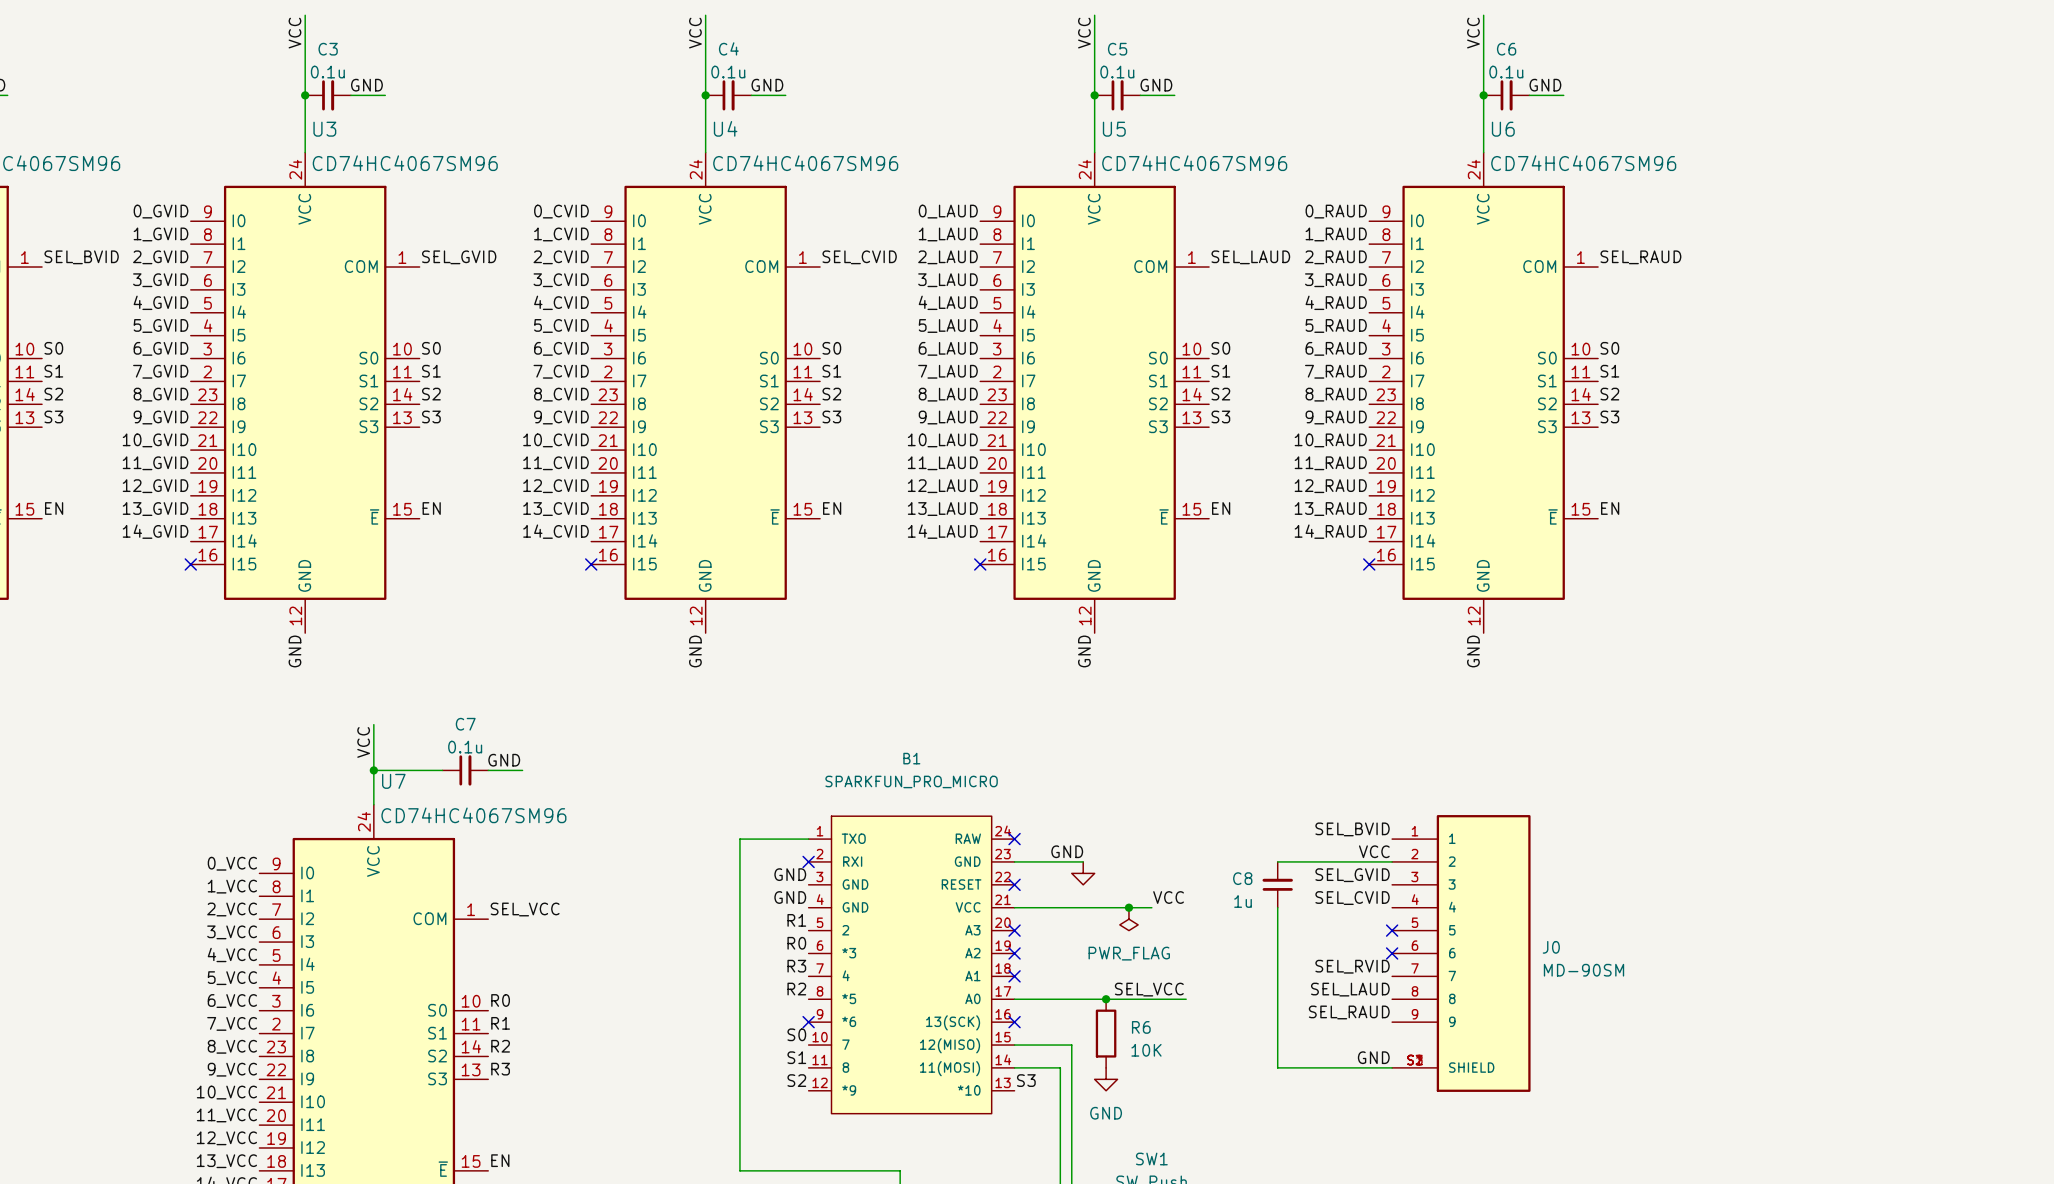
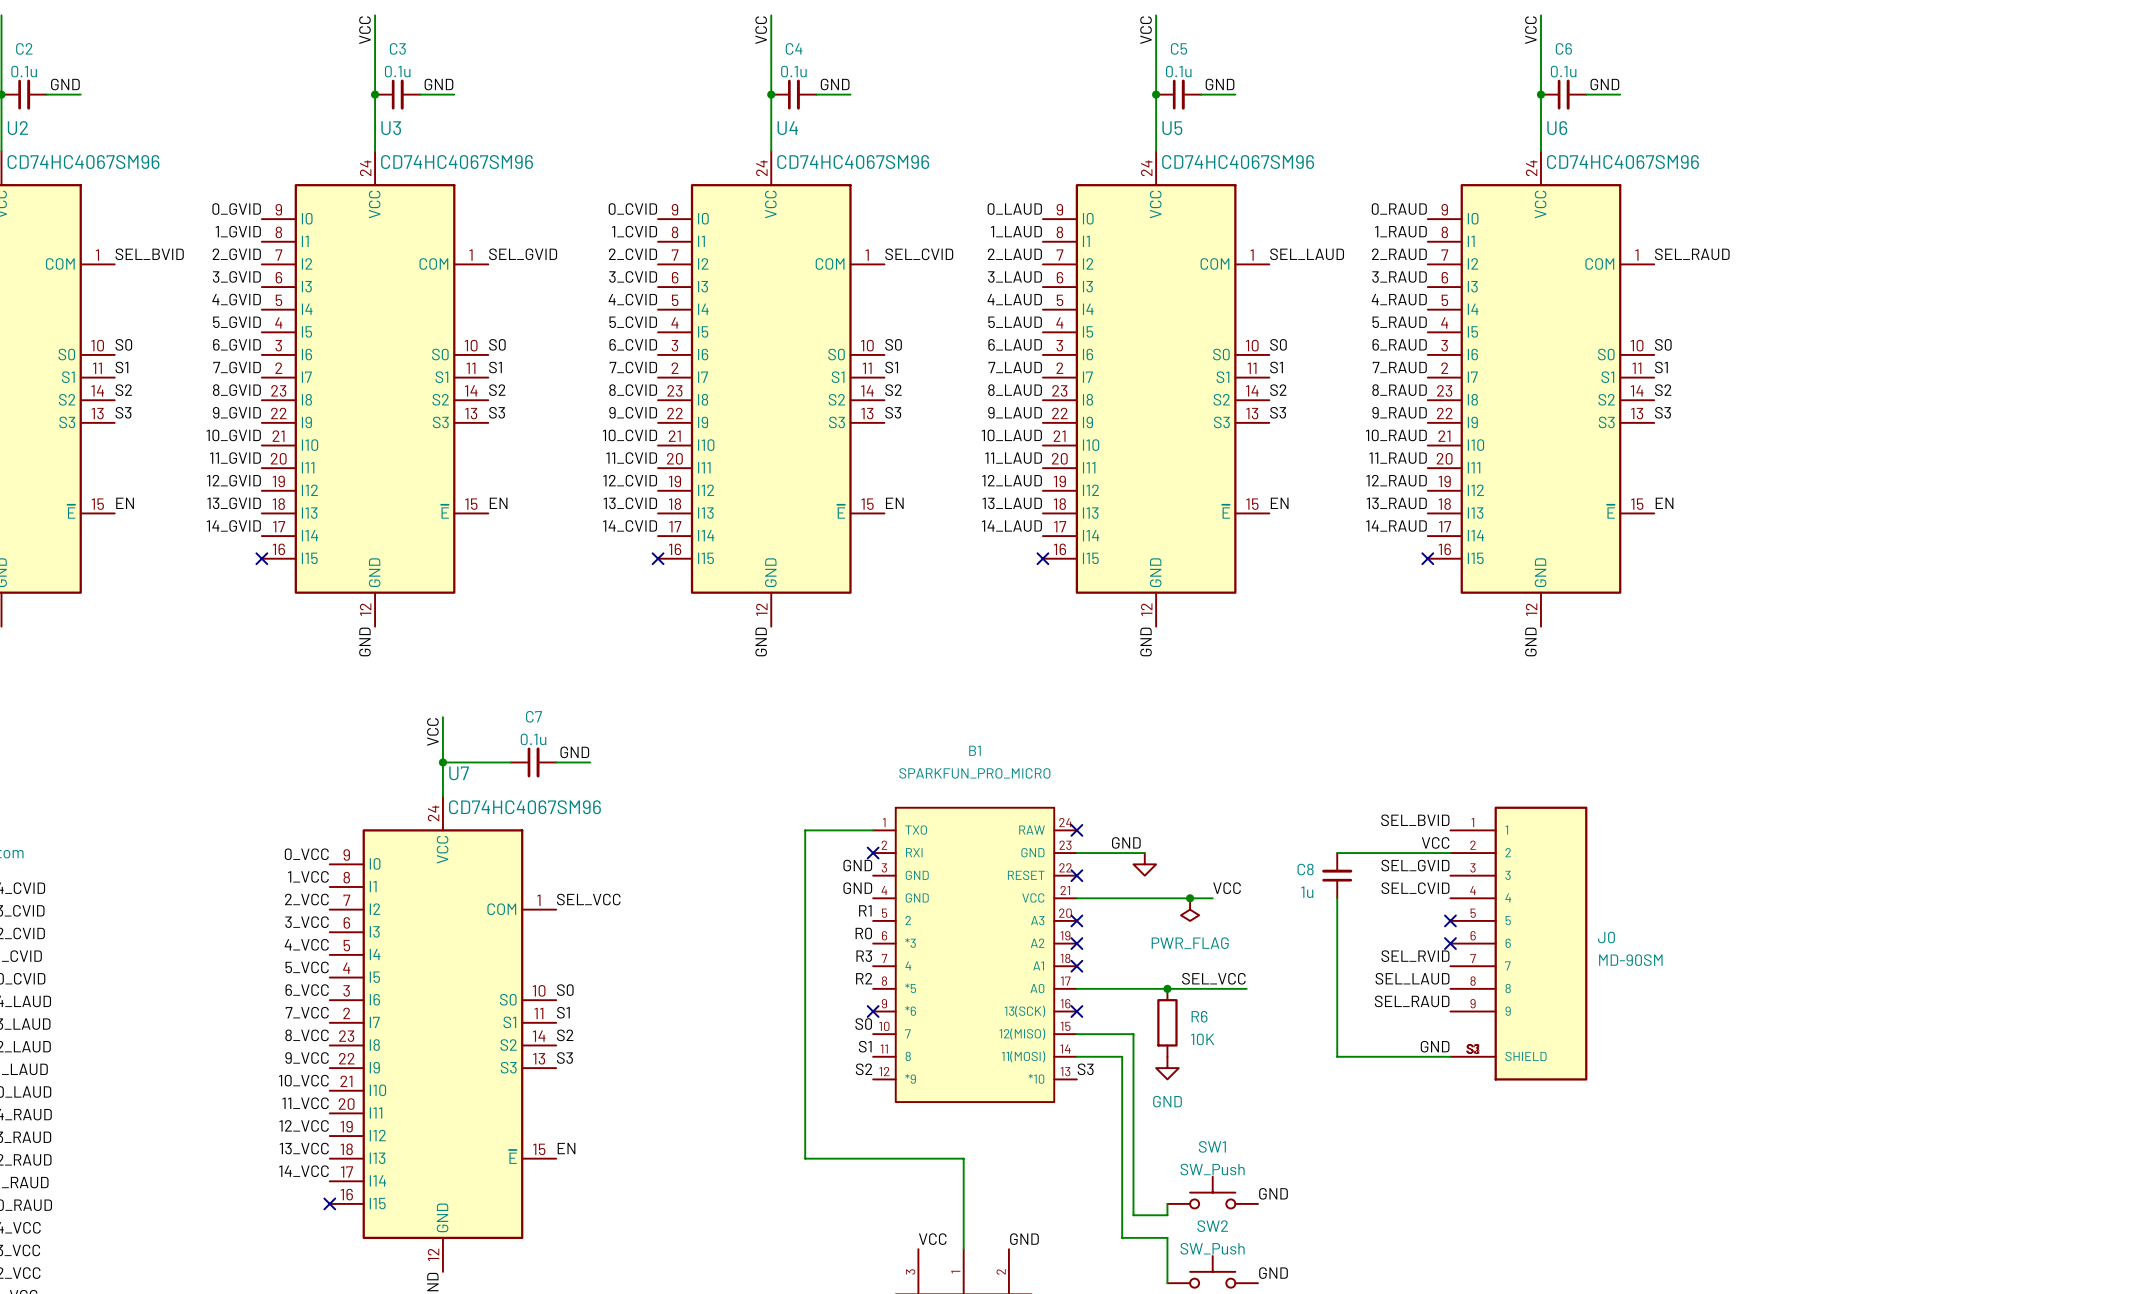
label: R0 (500, 1000) -> S0 (565, 990)
label: R1 (500, 1023) -> S1 (563, 1012)
label: R2 (500, 1046) -> S2 (565, 1035)
label: R3 (500, 1069) -> S3 (564, 1058)

